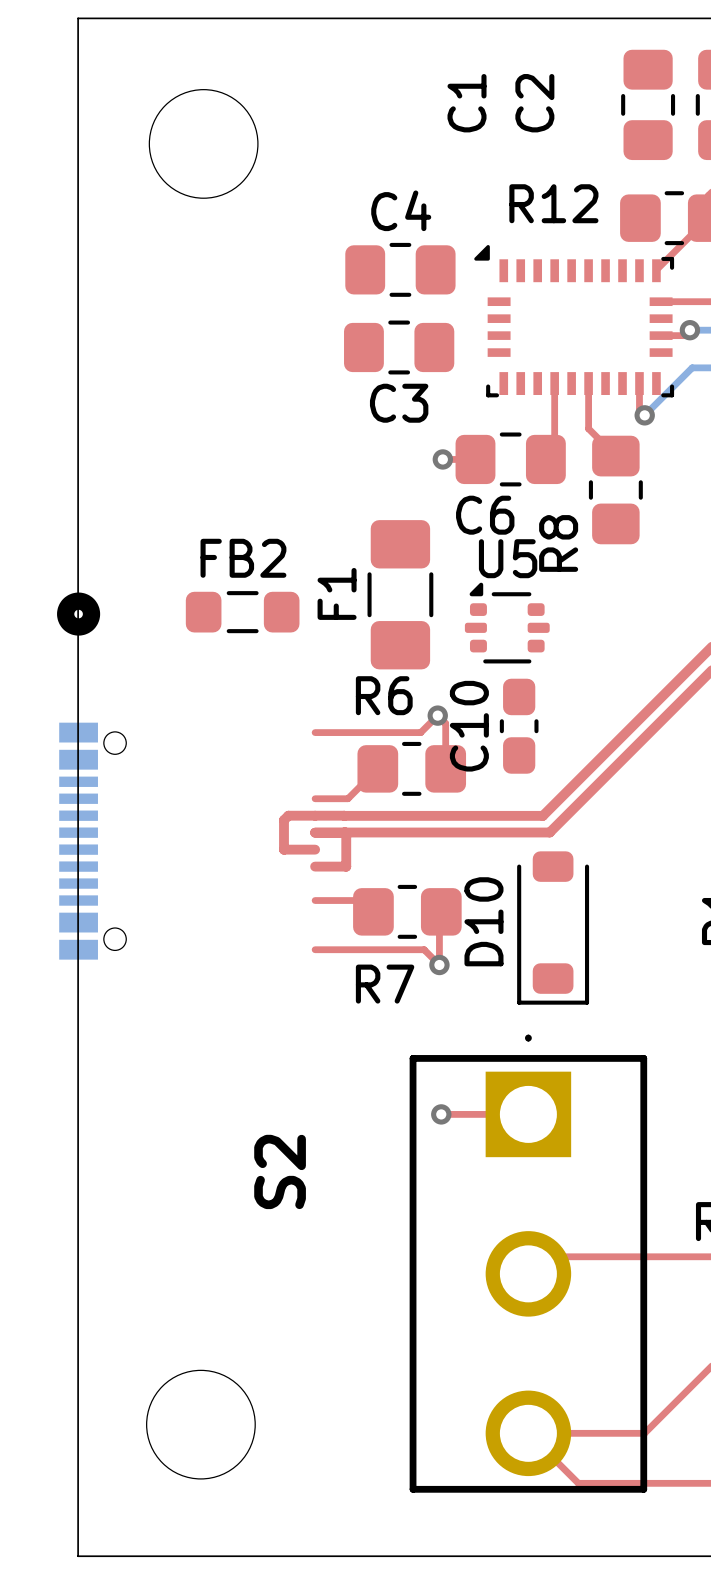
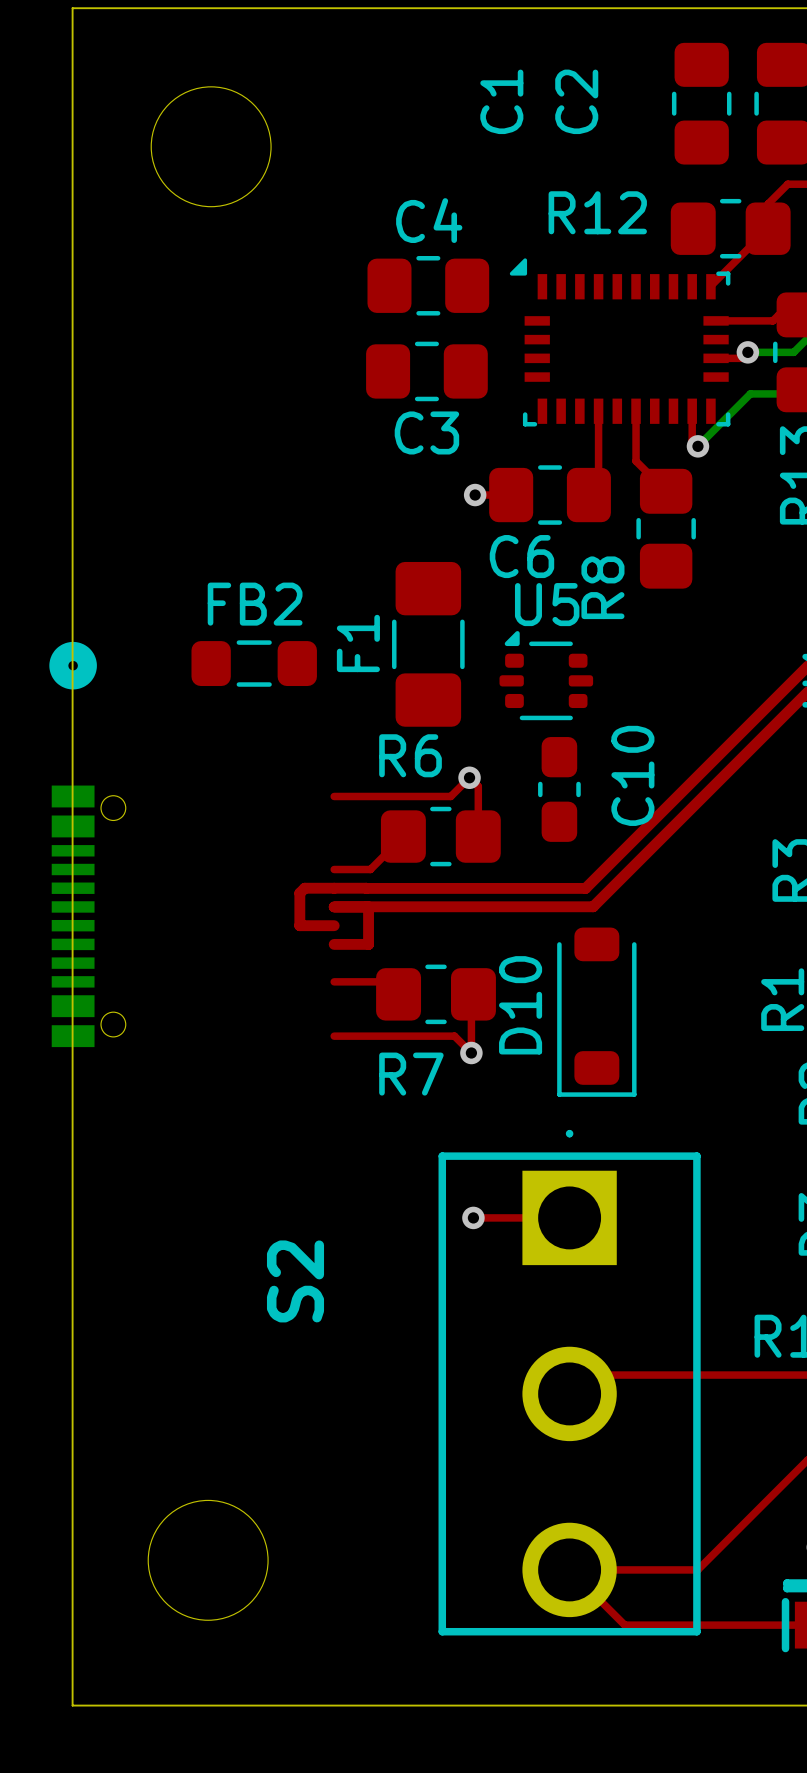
C10 name position: C10 (469, 726) -> C10 (632, 775)

